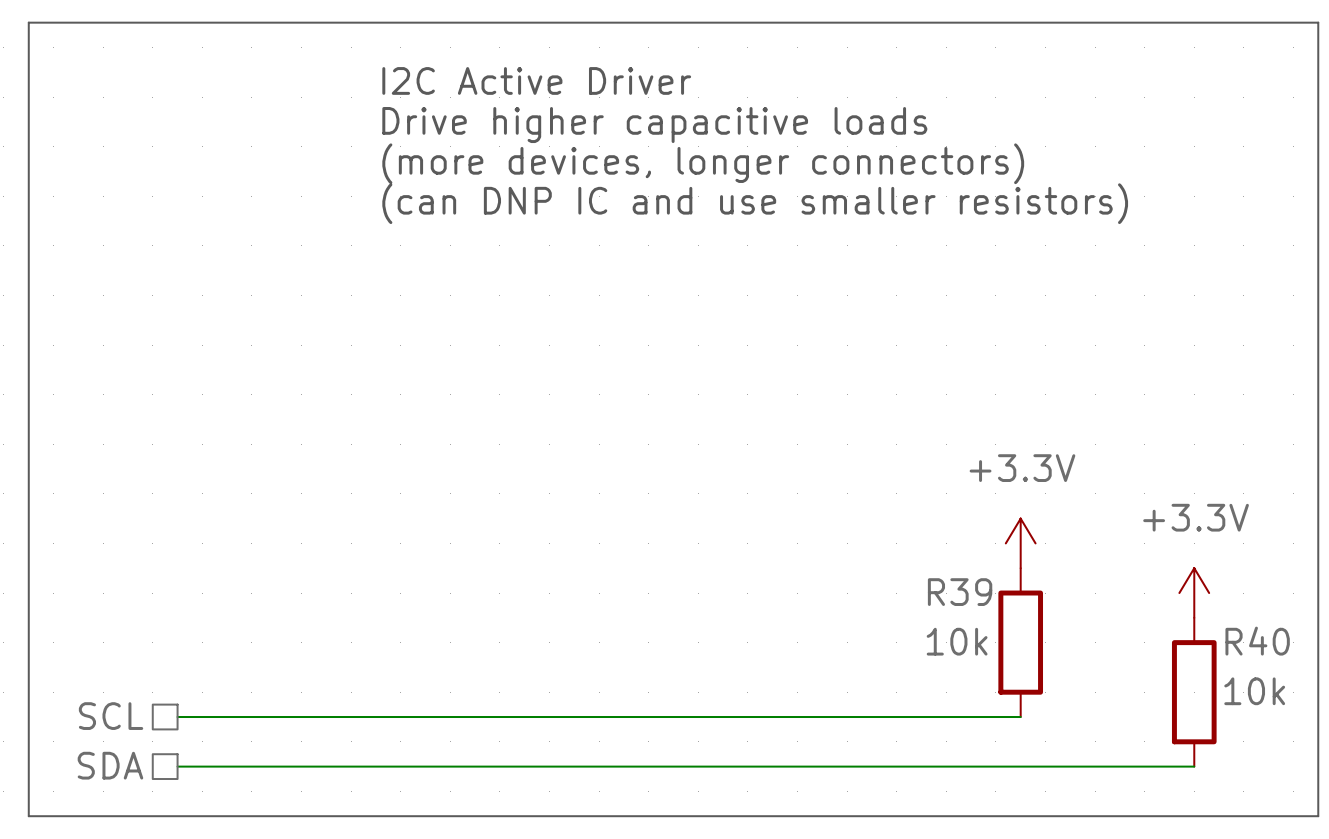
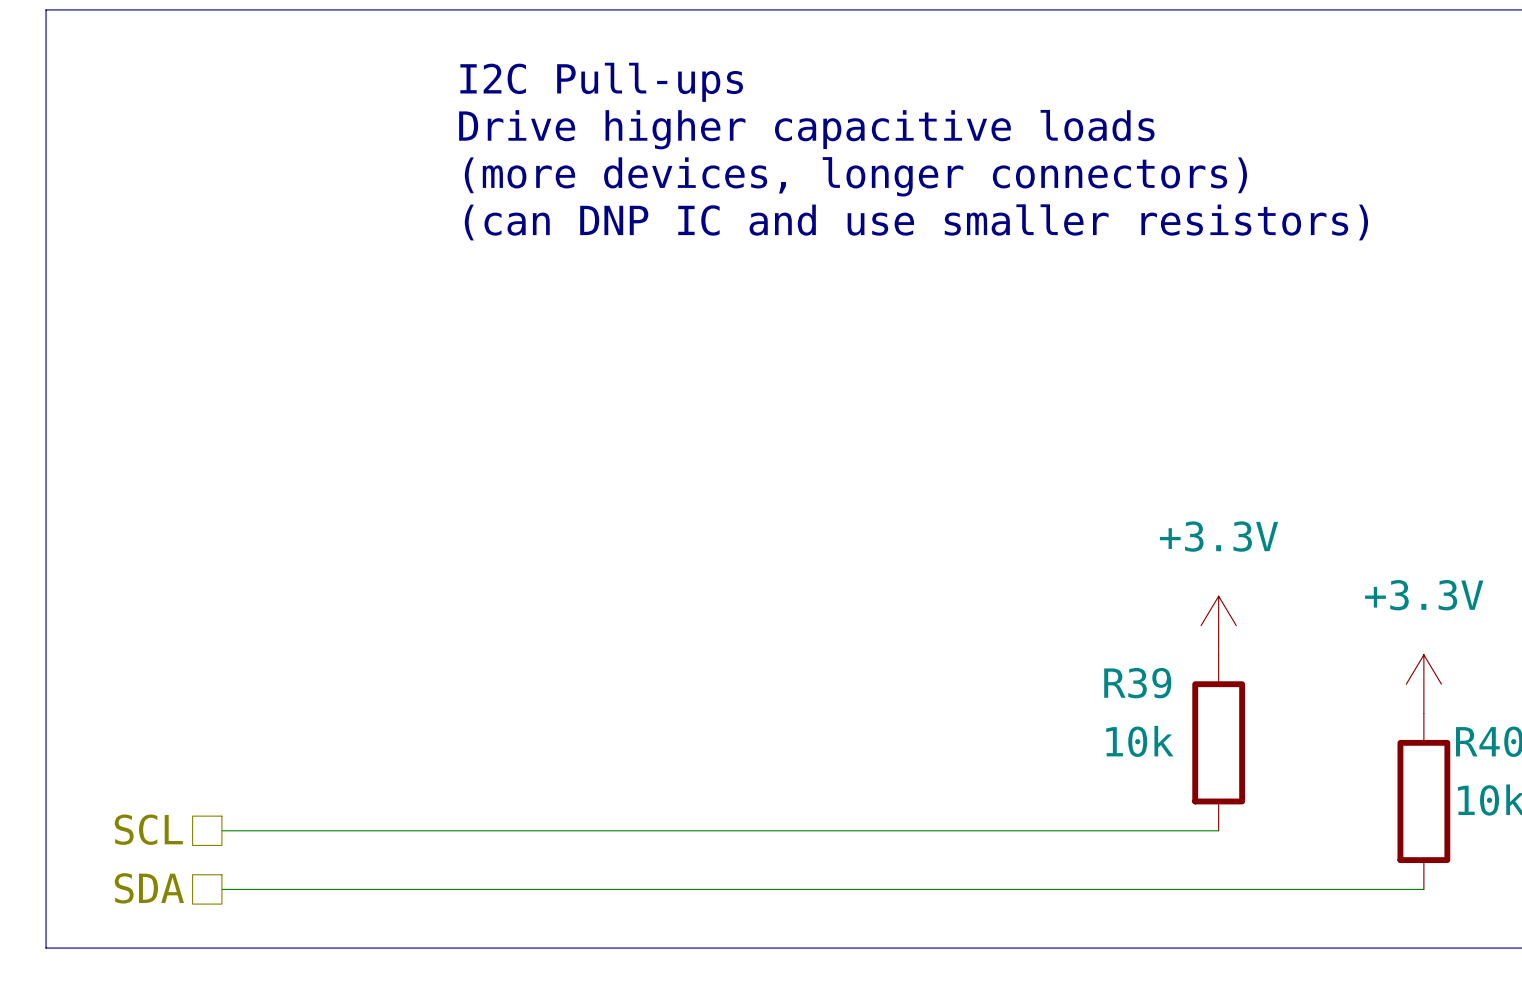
text: I2C Active Driver (536, 80) -> I2C Pull-ups (601, 82)

